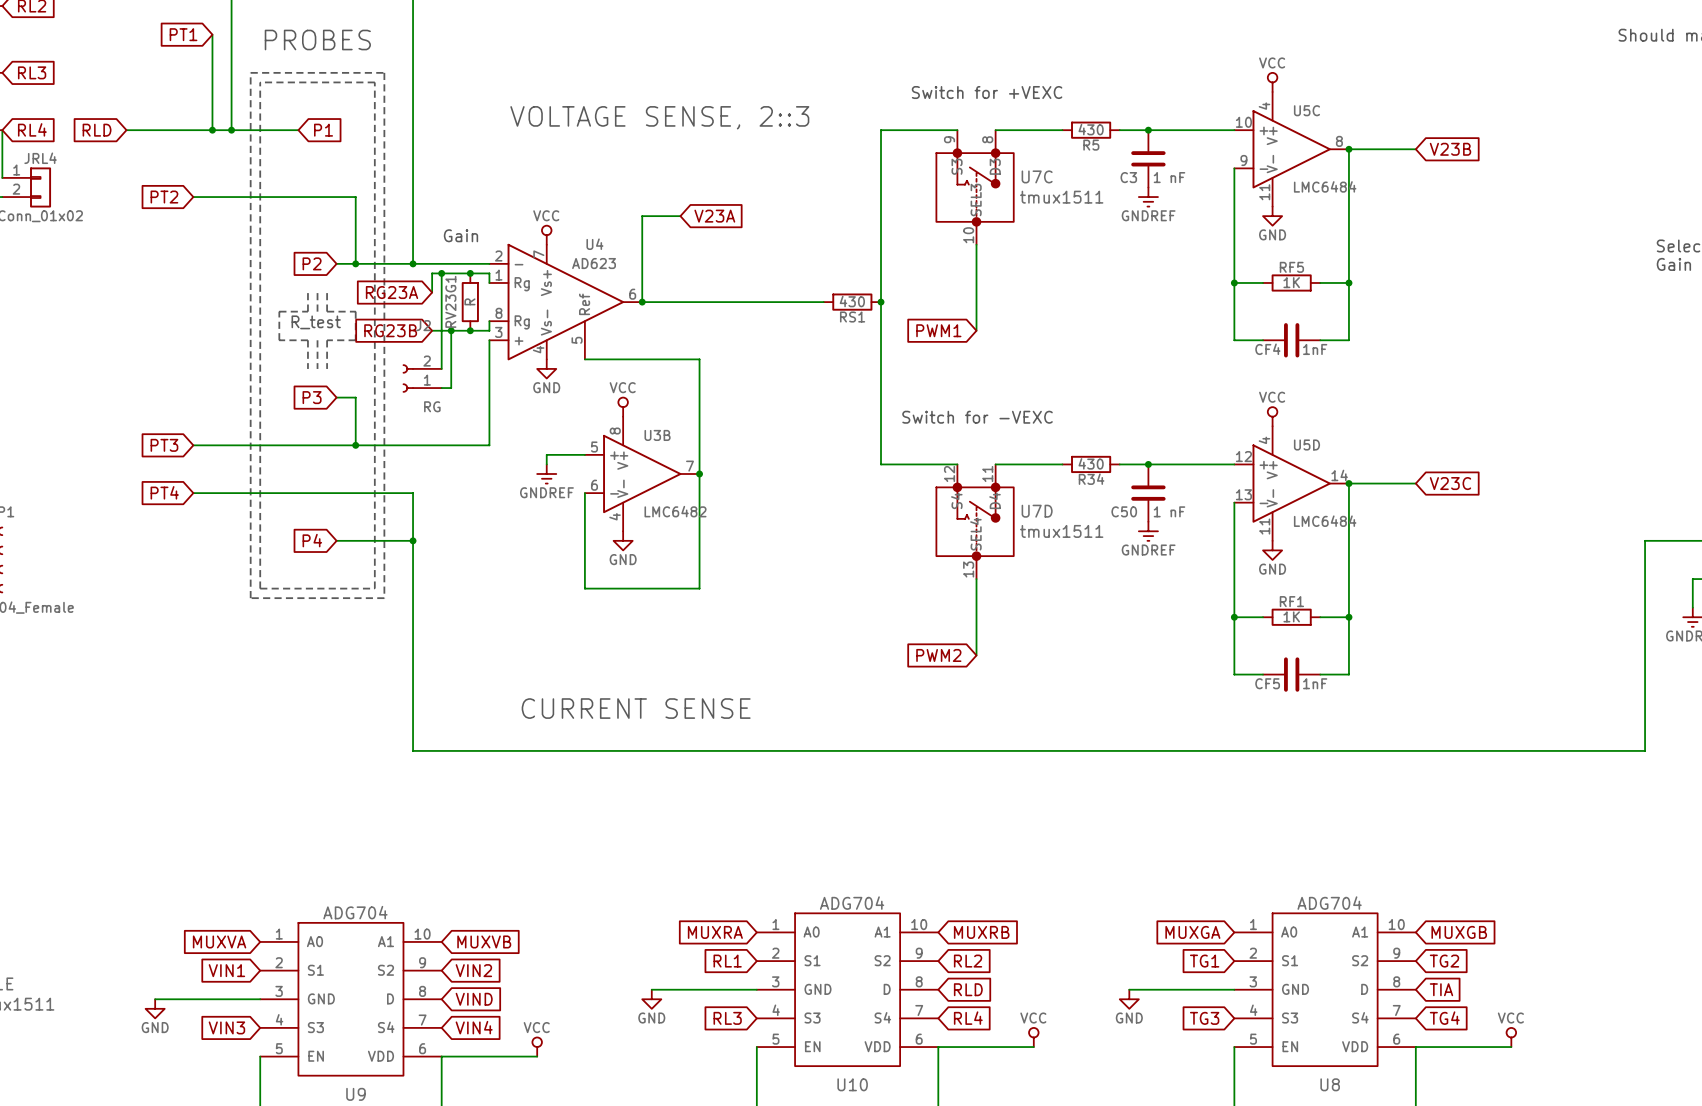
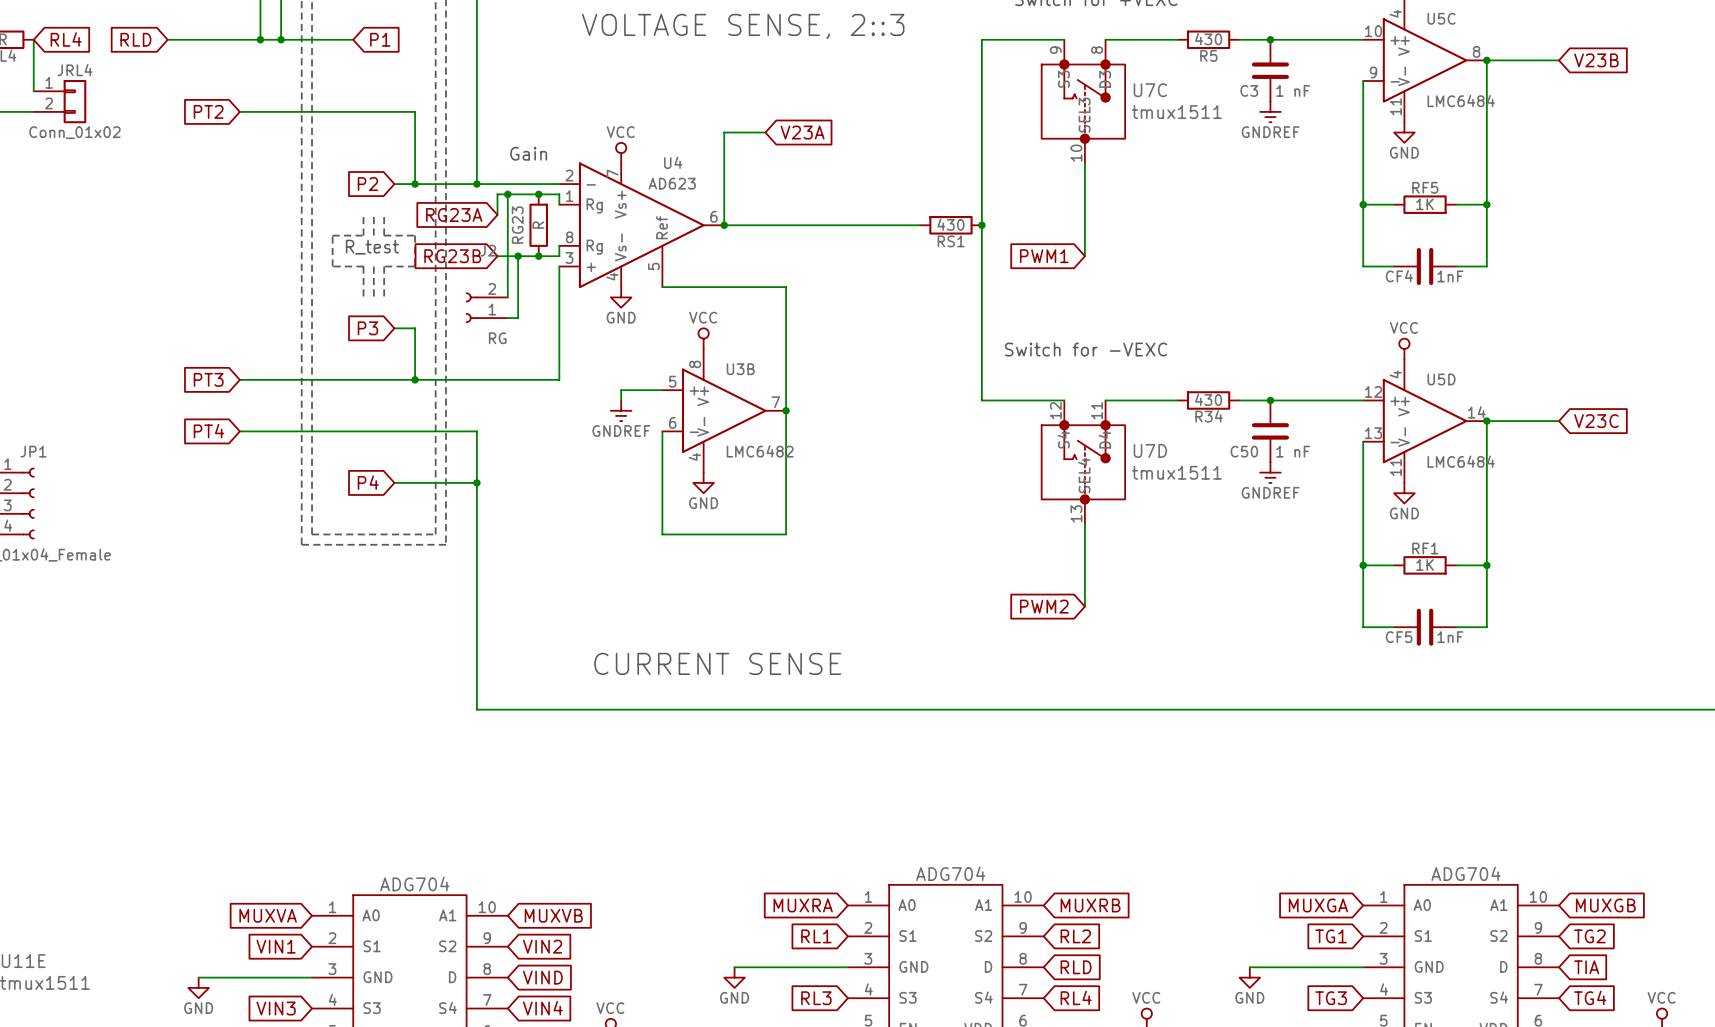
RV23G1 name: RV23G1 (450, 301) -> RG23 (517, 225)

